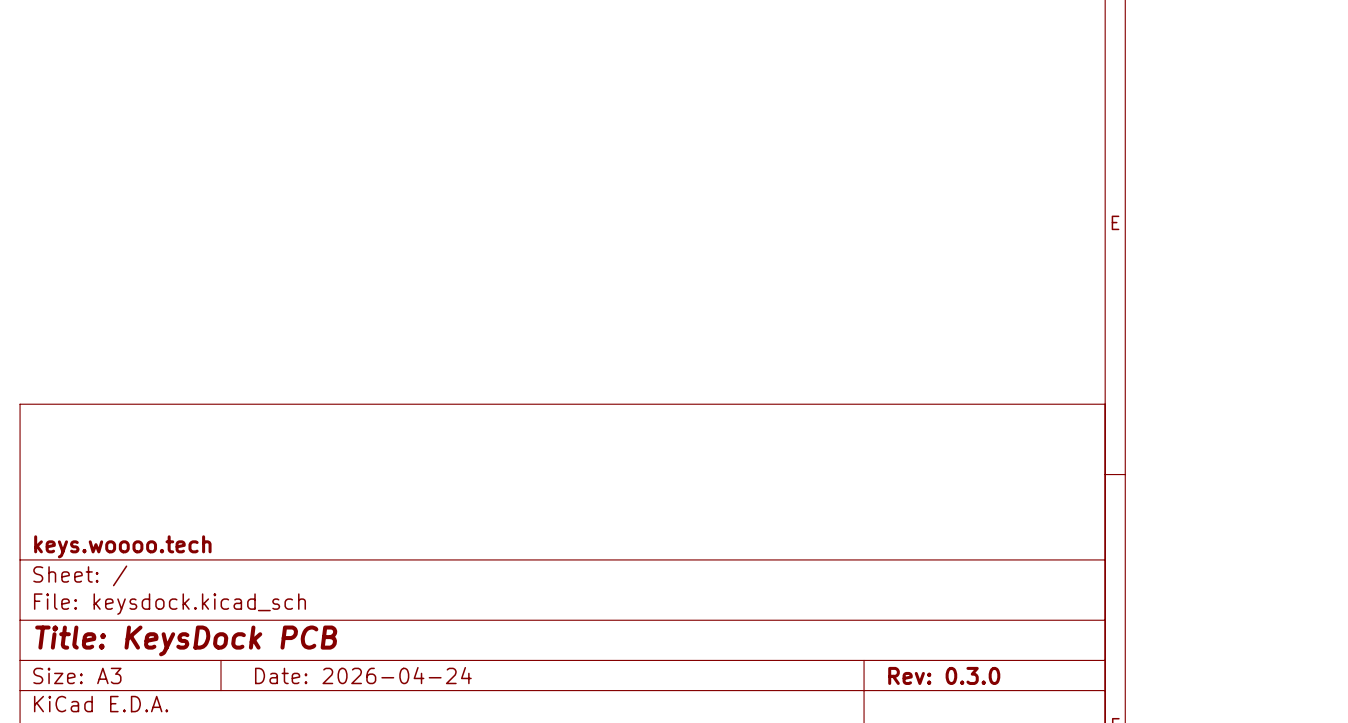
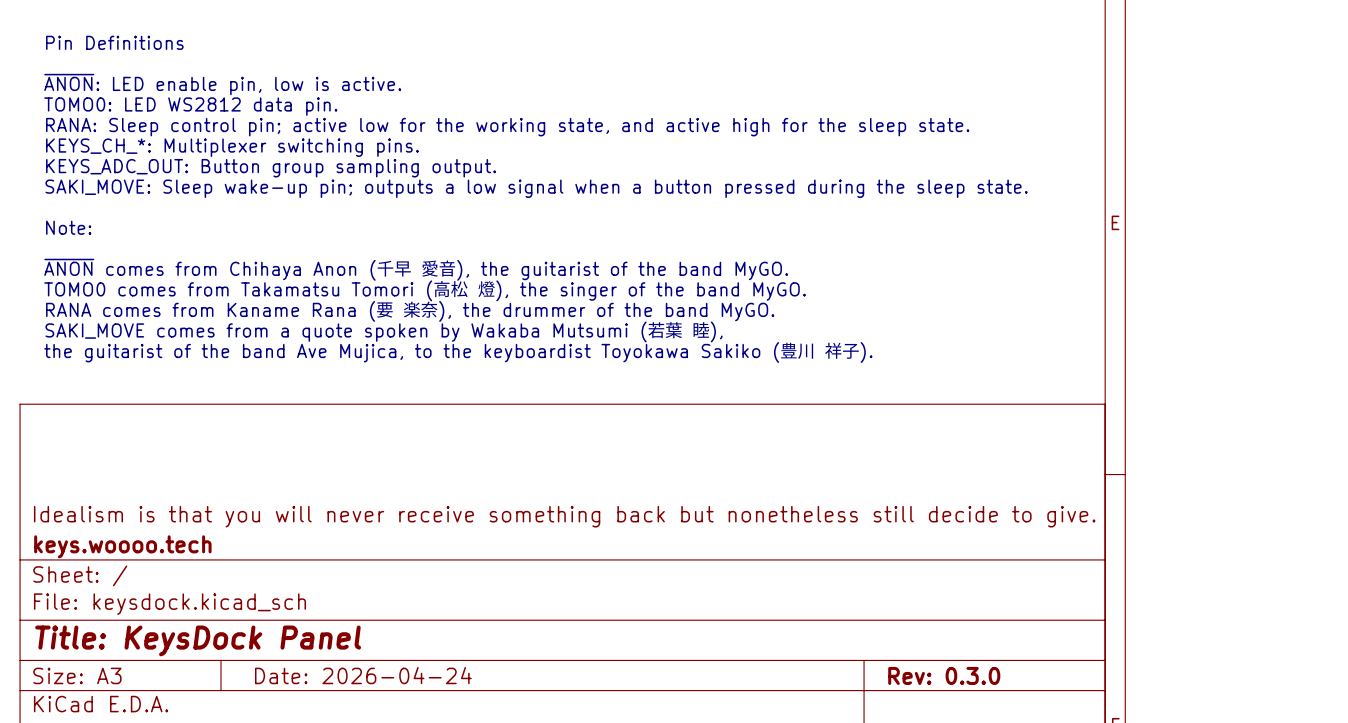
text: none -> Pin Definitions (114, 42)
text: none -> ~{ANON}: LED enable pin, low is active. (222, 84)
text: none -> TOMO0: LED WS2812 data pin. (190, 106)
text: none -> RANA: Sleep control pin; active low for the working state, and active high for the sleep state. (507, 127)
text: none -> KEYS_CH_*: Multiplexer switching pins. (232, 147)
text: none -> KEYS_ADC_OUT: Button group sampling output. (271, 168)
text: none -> SAKI_MOVE: Sleep wake-up pin; outputs a low signal when a button pressed during the sleep state. (536, 188)
text: none -> Note: (68, 227)
text: none -> ~{ANON} comes from Chihaya Anon (千早 愛音), the guitarist of the band MyGO. (416, 269)
text: none -> TOMO0 comes from Takamatsu Tomori (高松 燈), the singer of the band MyGO. (425, 290)
text: none -> RANA comes from Kaname Rana (要 楽奈), the drummer of the band MyGO. (410, 311)
text: none -> SAKI_MOVE comes from a quote spoken by Wakaba Mutsumi (若葉 睦), (384, 331)
text: none -> the guitarist of the band Ave Mujica, to the keyboardist Toyokawa Sakiko (豊川 祥子). (458, 352)
title block: none -> Idealism is that you will never receive something back but nonetheless still decide to give. (564, 516)
title block: Title: KeysDock PCB (186, 640) -> Title: KeysDock Panel (198, 640)

